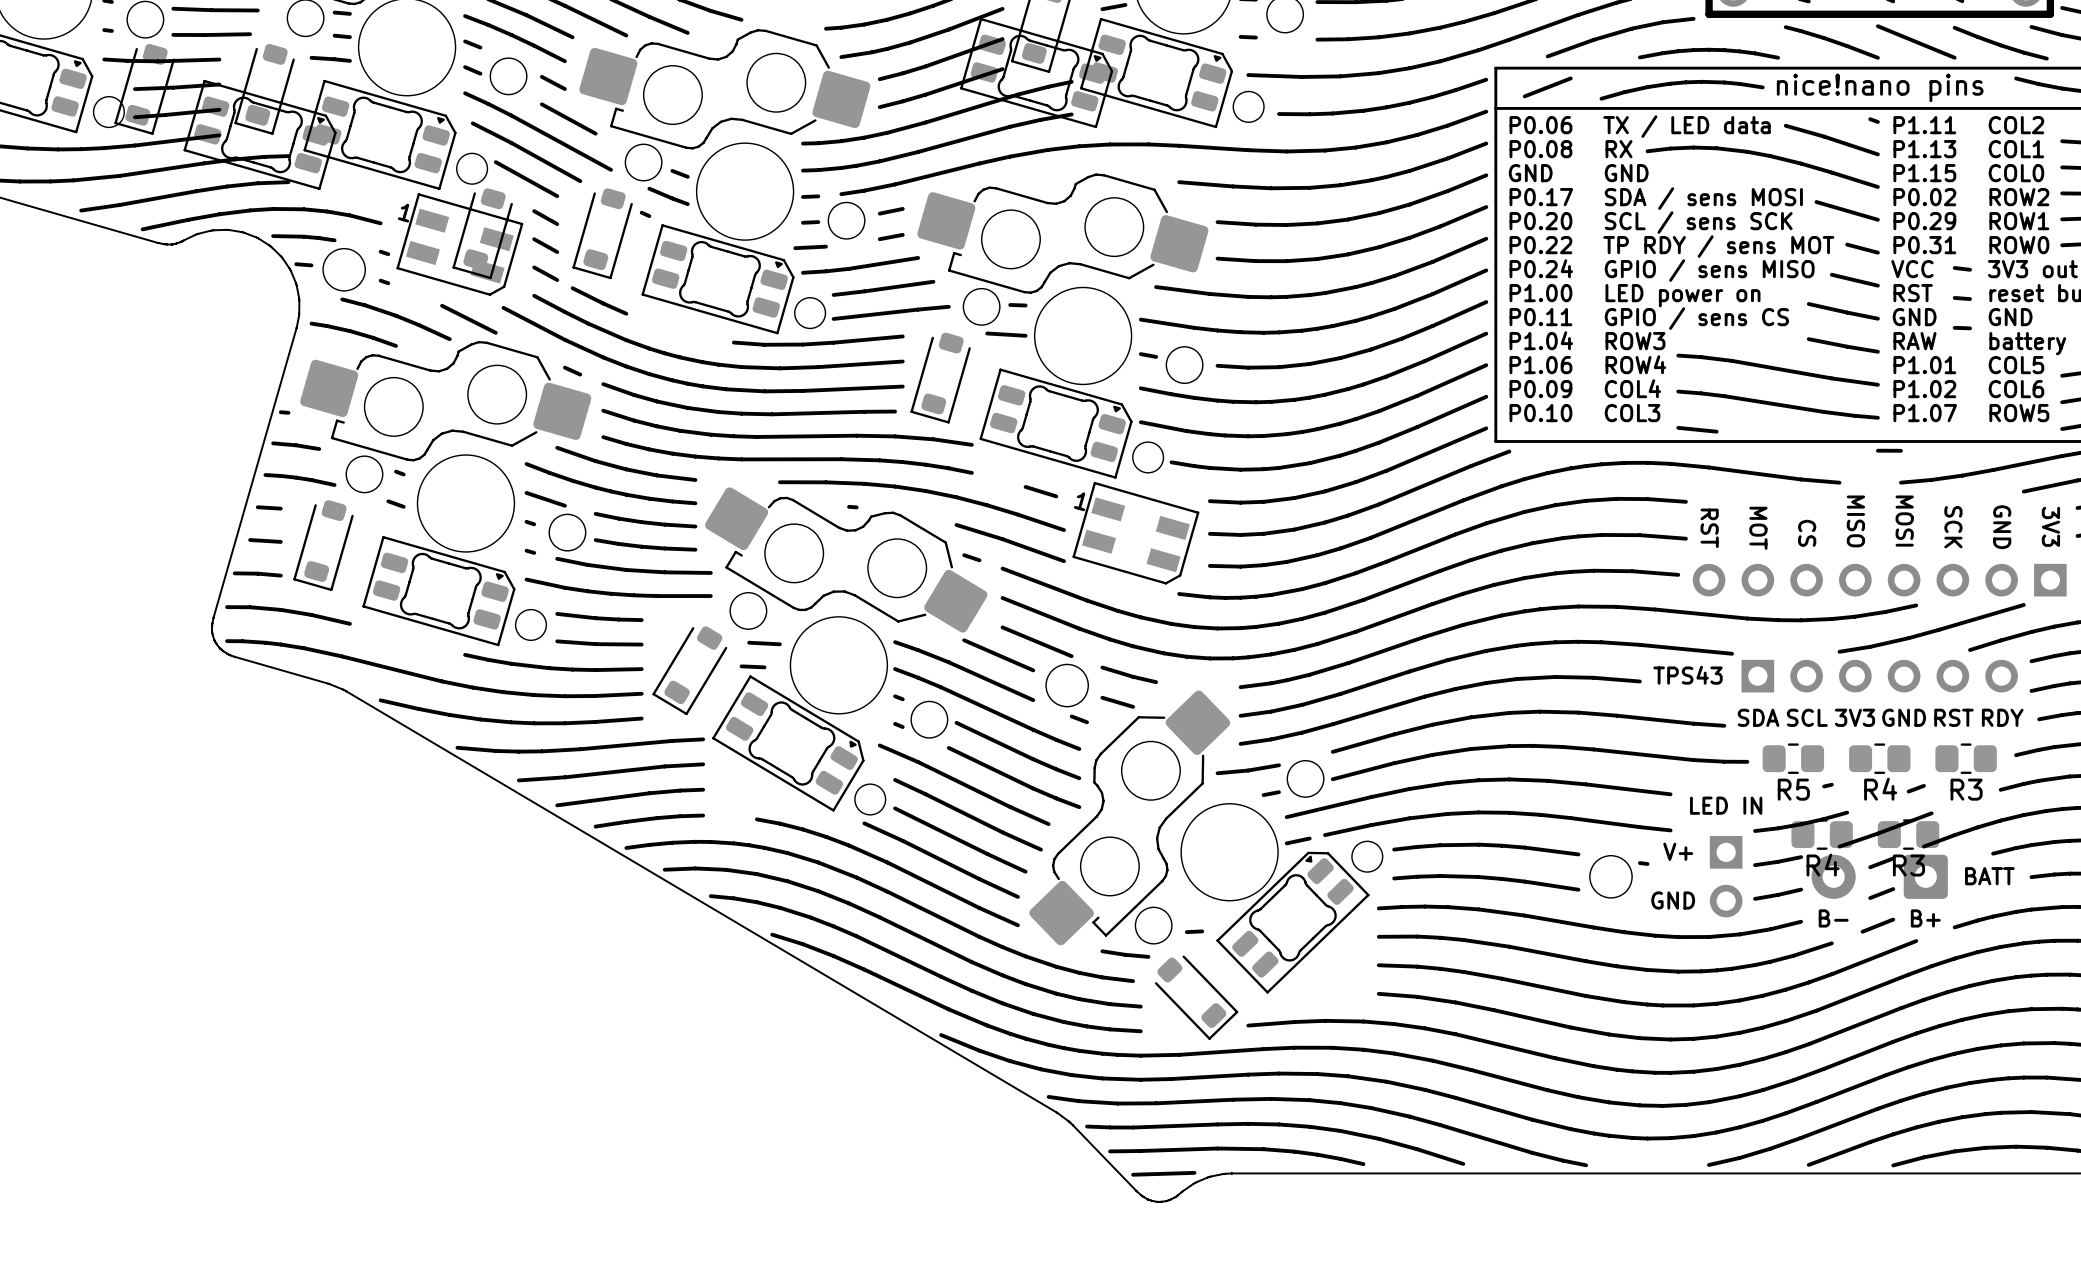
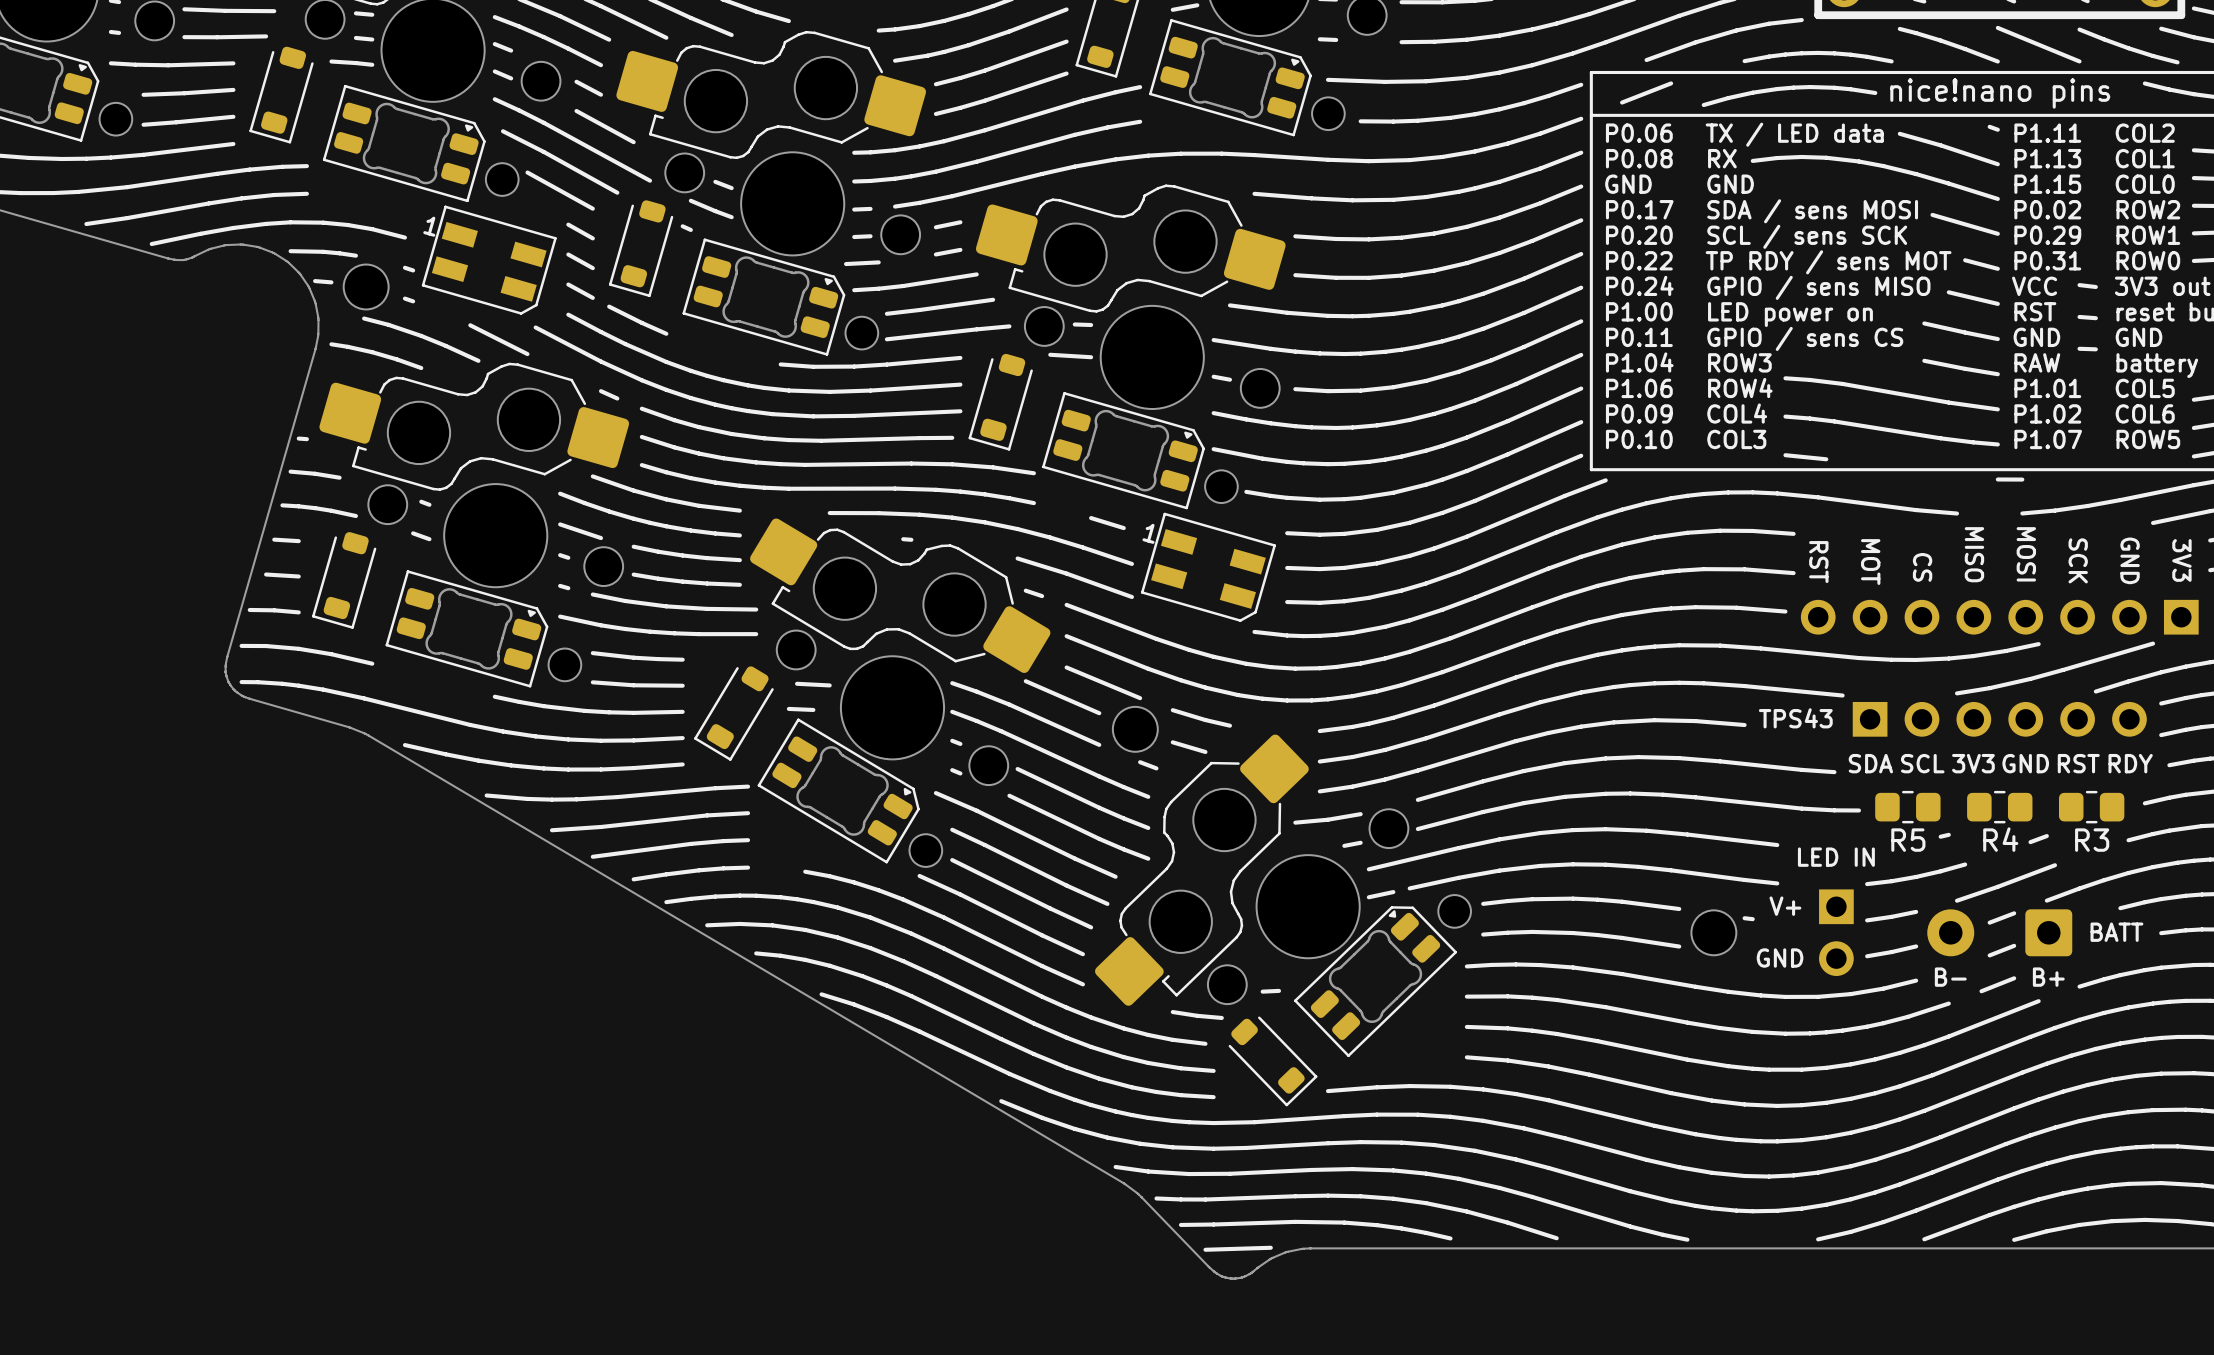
part: (1036, 73) -> none
part: (144, 89) -> none
part: (260, 134) -> none
part: (482, 233) -> none
R4: (1822, 834) -> none
R3: (1908, 834) -> none

